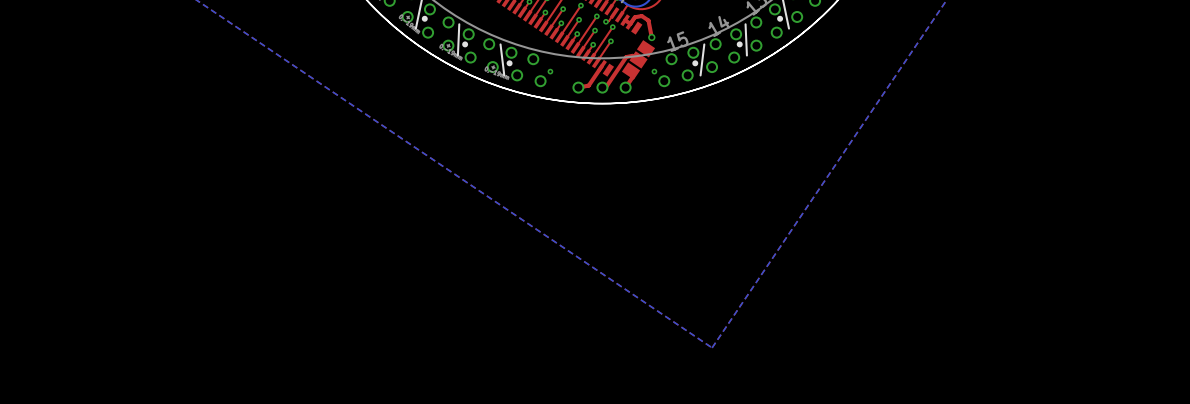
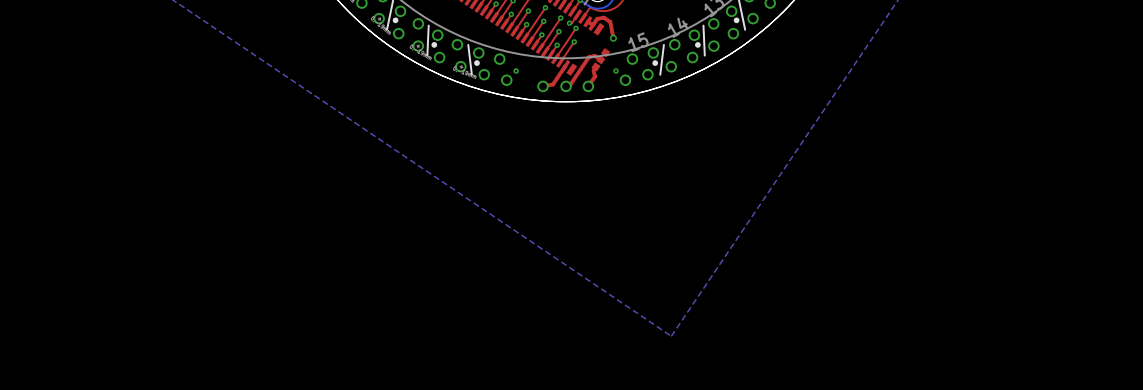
part footprint: [621, 40, 656, 80] -> [591, 48, 611, 72]

